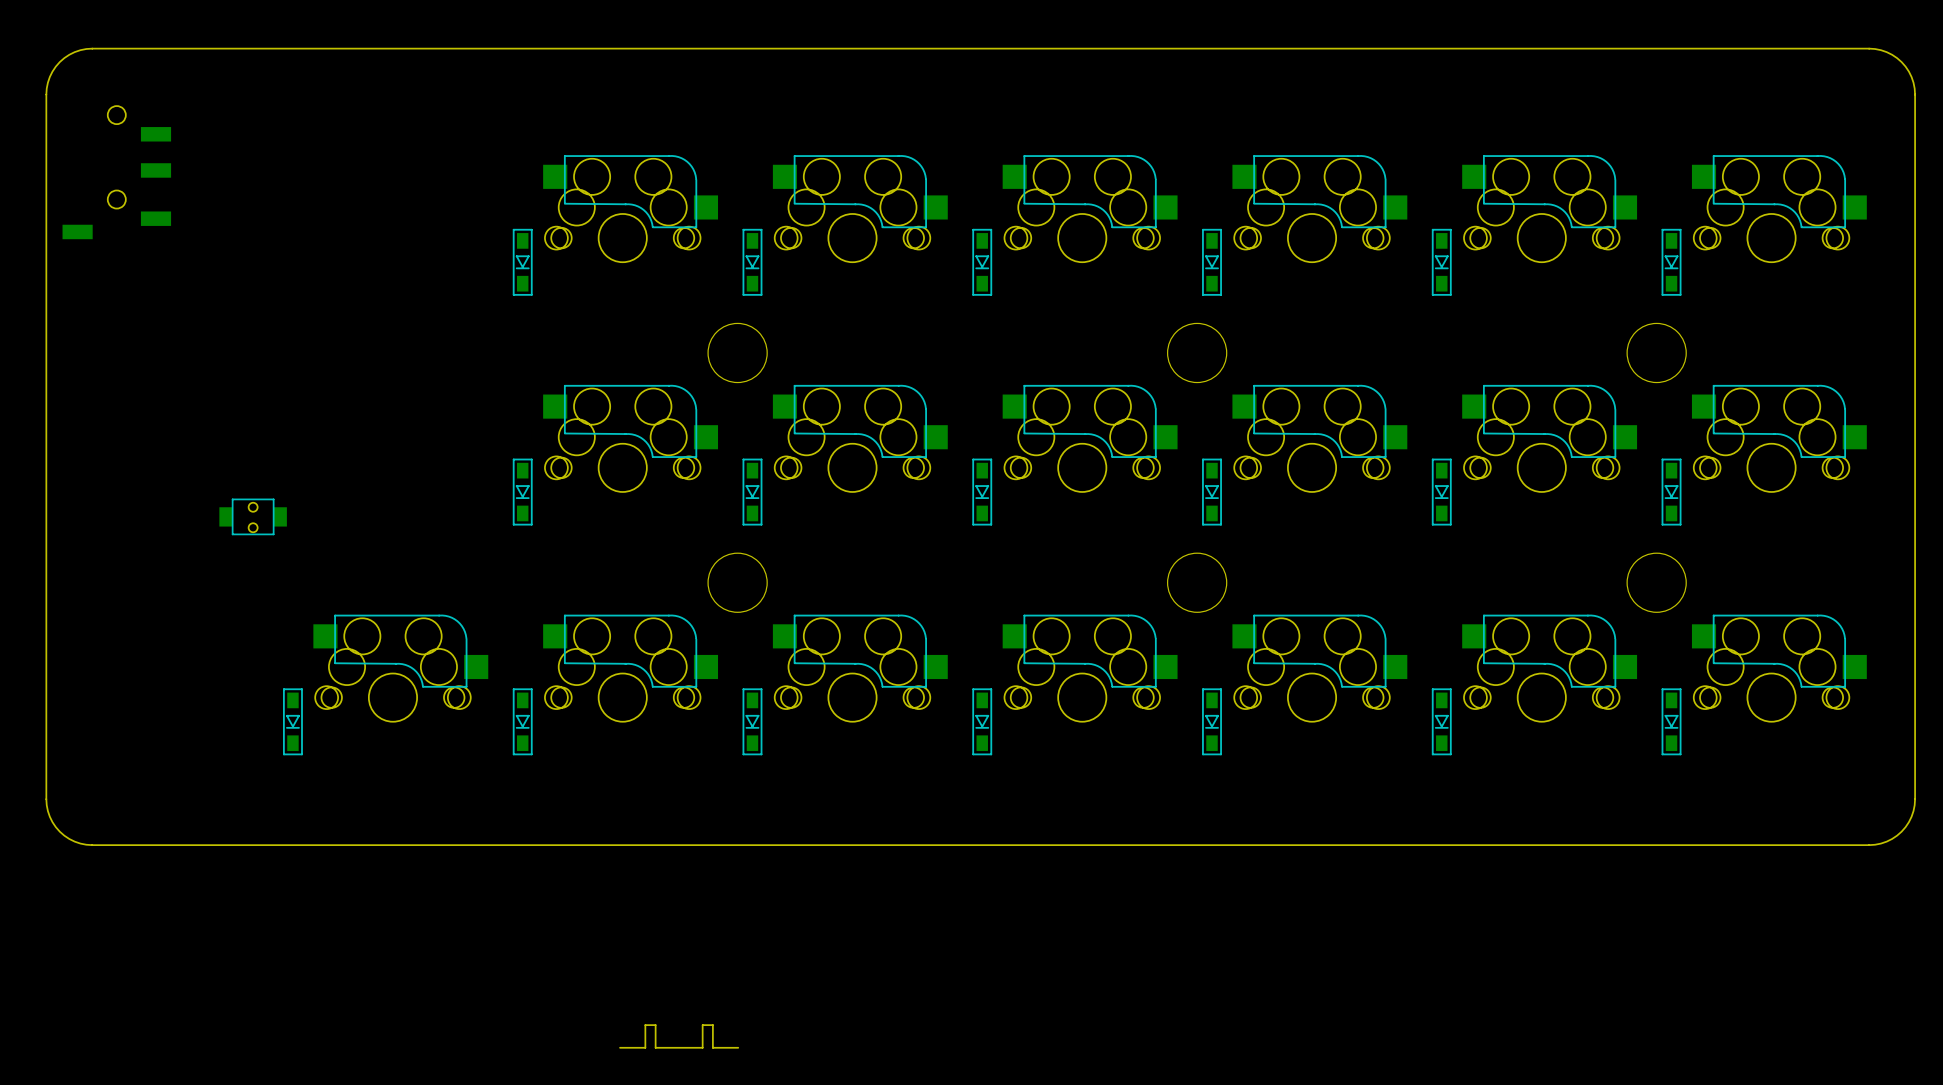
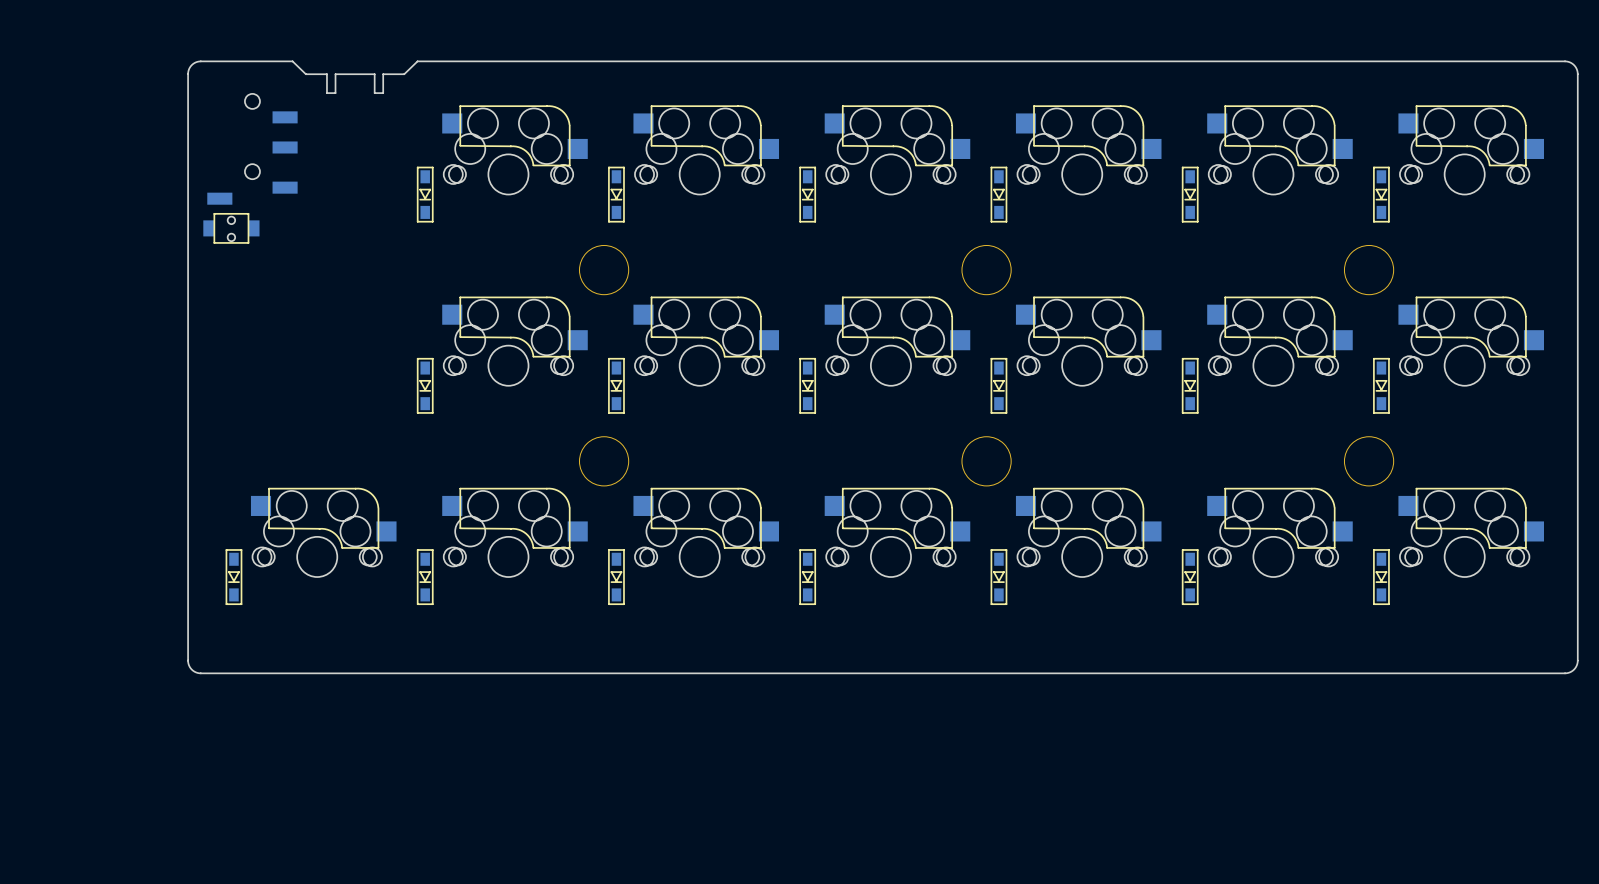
board edge: (1869, 48) (92, 48) (74, 52) (59, 62) (52, 71) (47, 82) (46, 94) (46, 799) (49, 816) (59, 831) (69, 838) (80, 843) (92, 845) (1869, 845) (1886, 841) (1897, 835) (1905, 827) (1913, 811) (1915, 799) (1915, 94) (1911, 76) (1901, 62) (1886, 52) (1869, 48) -> none
board edge: none -> (200, 61) (292, 61) (305, 74)
board edge: none -> (200, 61) (191, 65) (188, 74) (188, 660)
board edge: none -> (404, 74) (417, 61) (1565, 61) (1571, 63) (1576, 67) (1577, 74) (1576, 665) (1572, 670) (1565, 673) (200, 673) (191, 669) (188, 660)
part: none -> (355, 83)
part position: (116, 172) -> (252, 149)
part position: (253, 516) -> (231, 228)
part: (679, 1036) -> none

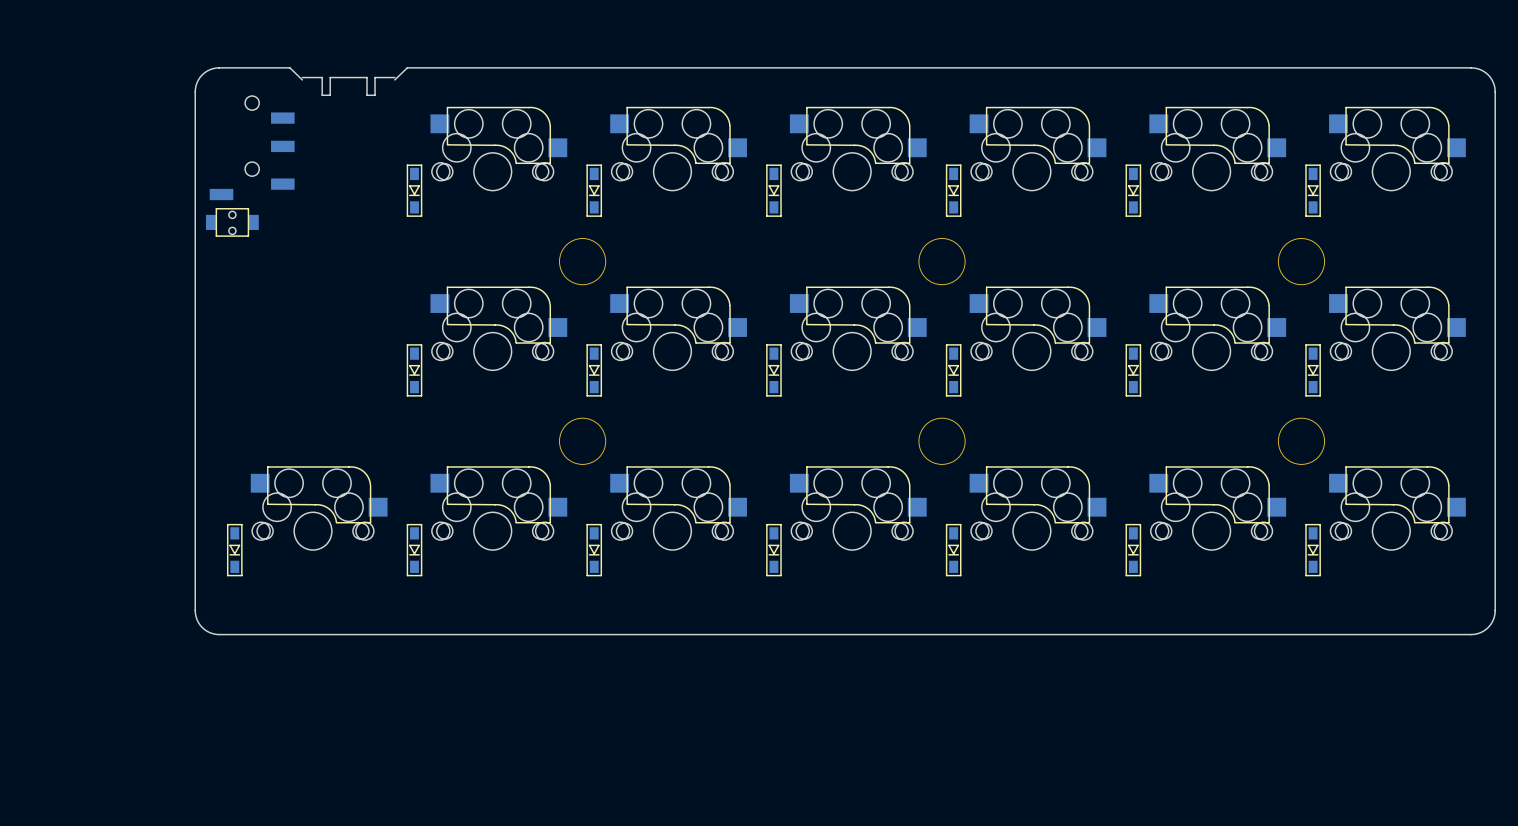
board edge: (200, 61) (292, 61) (305, 74) -> none
board edge: (200, 61) (191, 65) (188, 74) (188, 660) -> none
board edge: (404, 74) (417, 61) (1565, 61) (1571, 63) (1576, 67) (1577, 74) (1576, 665) (1572, 670) (1565, 673) (200, 673) (191, 669) (188, 660) -> none
board edge: none -> (394, 79) (407, 67) (1471, 67) (1480, 69) (1492, 79) (1495, 91) (1495, 610) (1493, 619) (1485, 629) (1471, 634) (219, 634) (210, 632) (200, 625) (195, 610) (195, 88) (202, 74) (216, 68) (289, 67) (302, 79)

